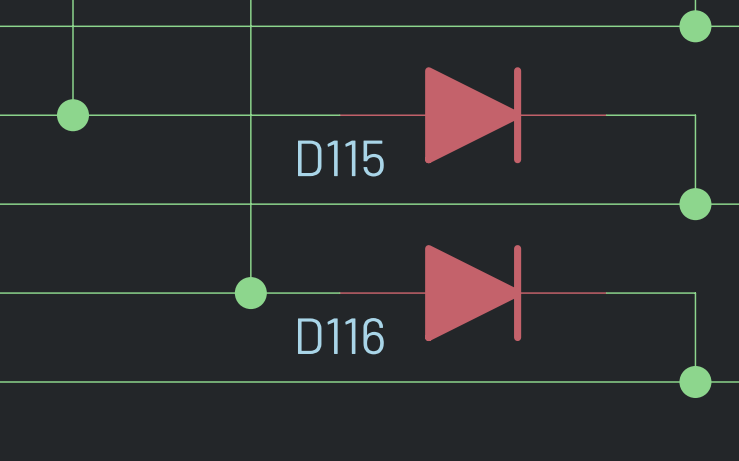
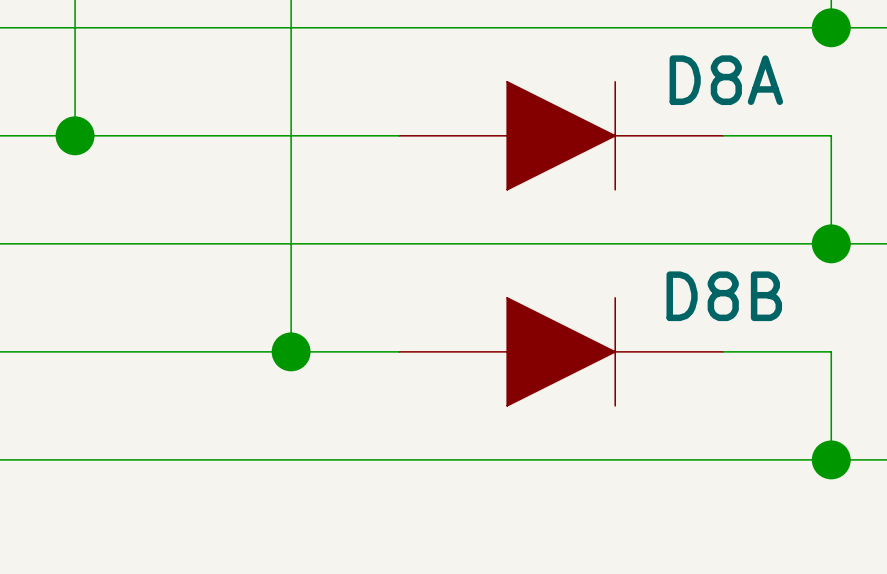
D115: (473, 115) -> none
D8A: none -> (561, 135)
D116: (473, 293) -> none
D8B: none -> (561, 351)

